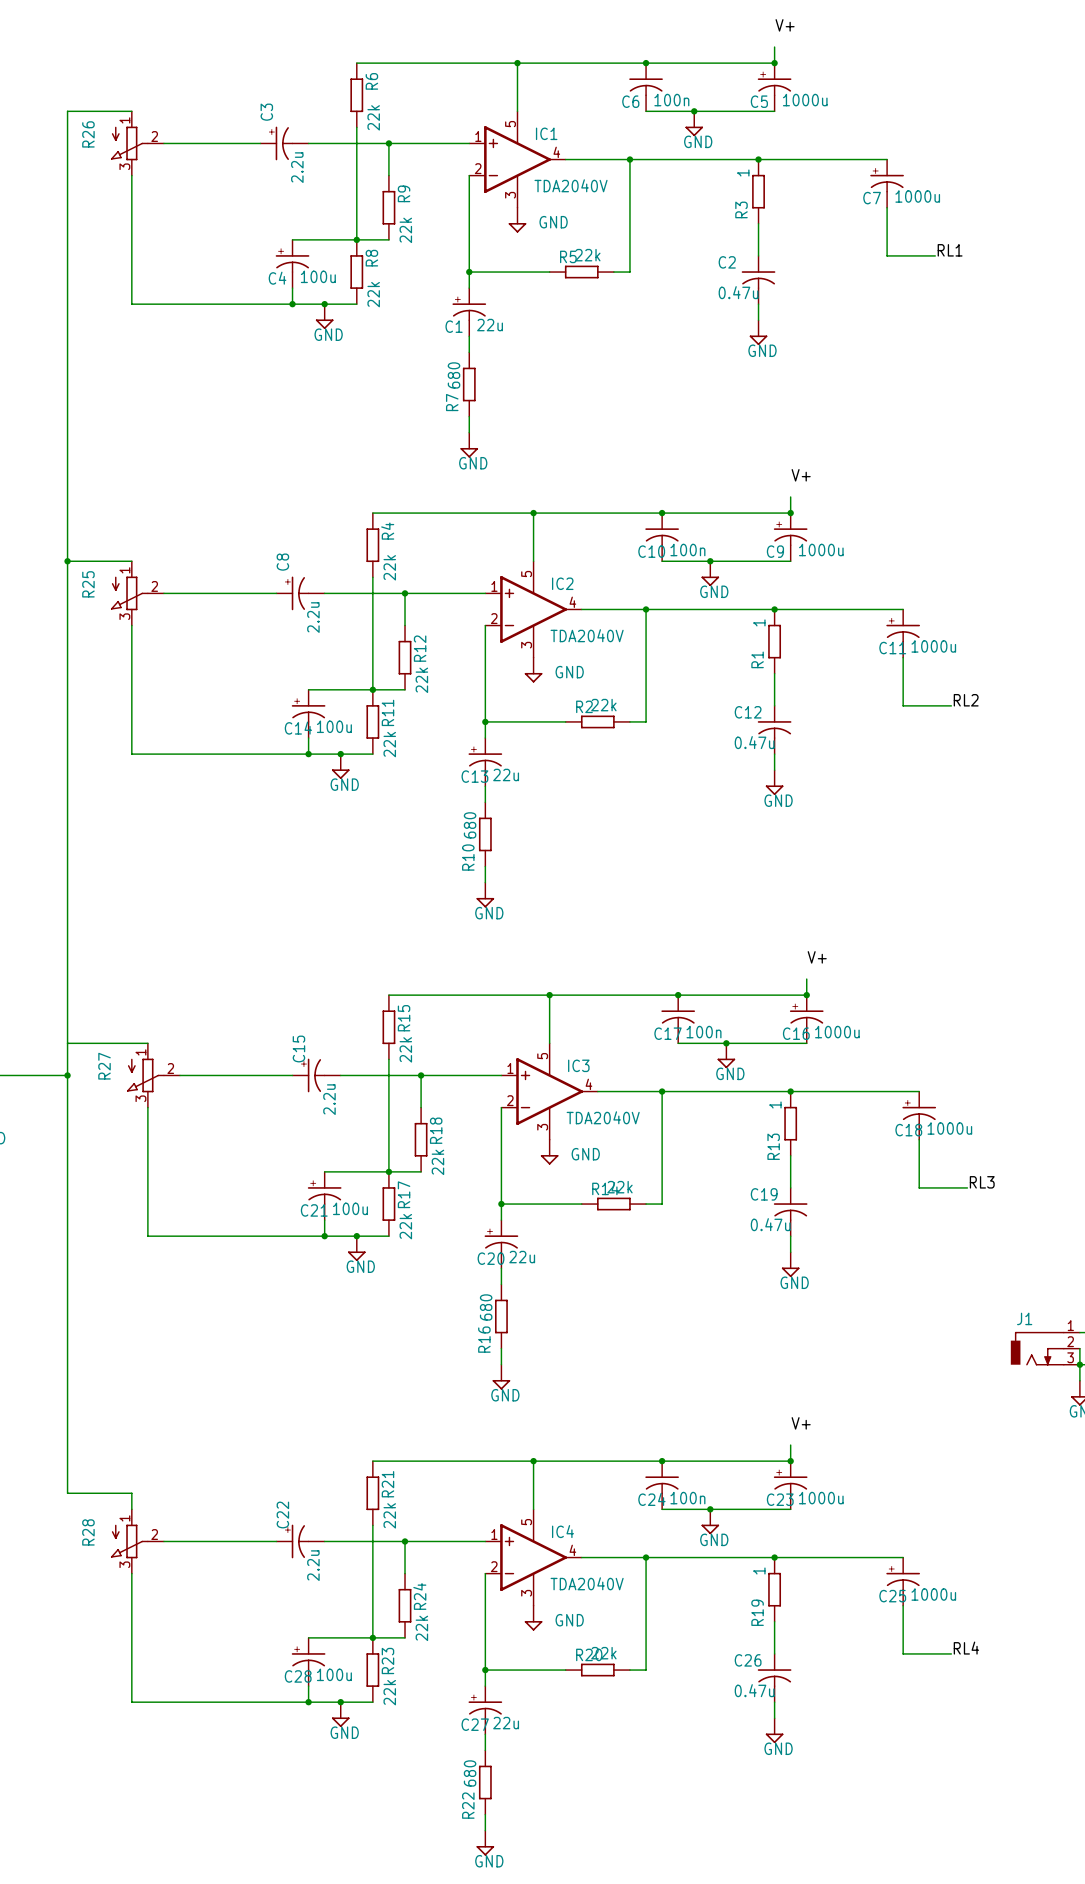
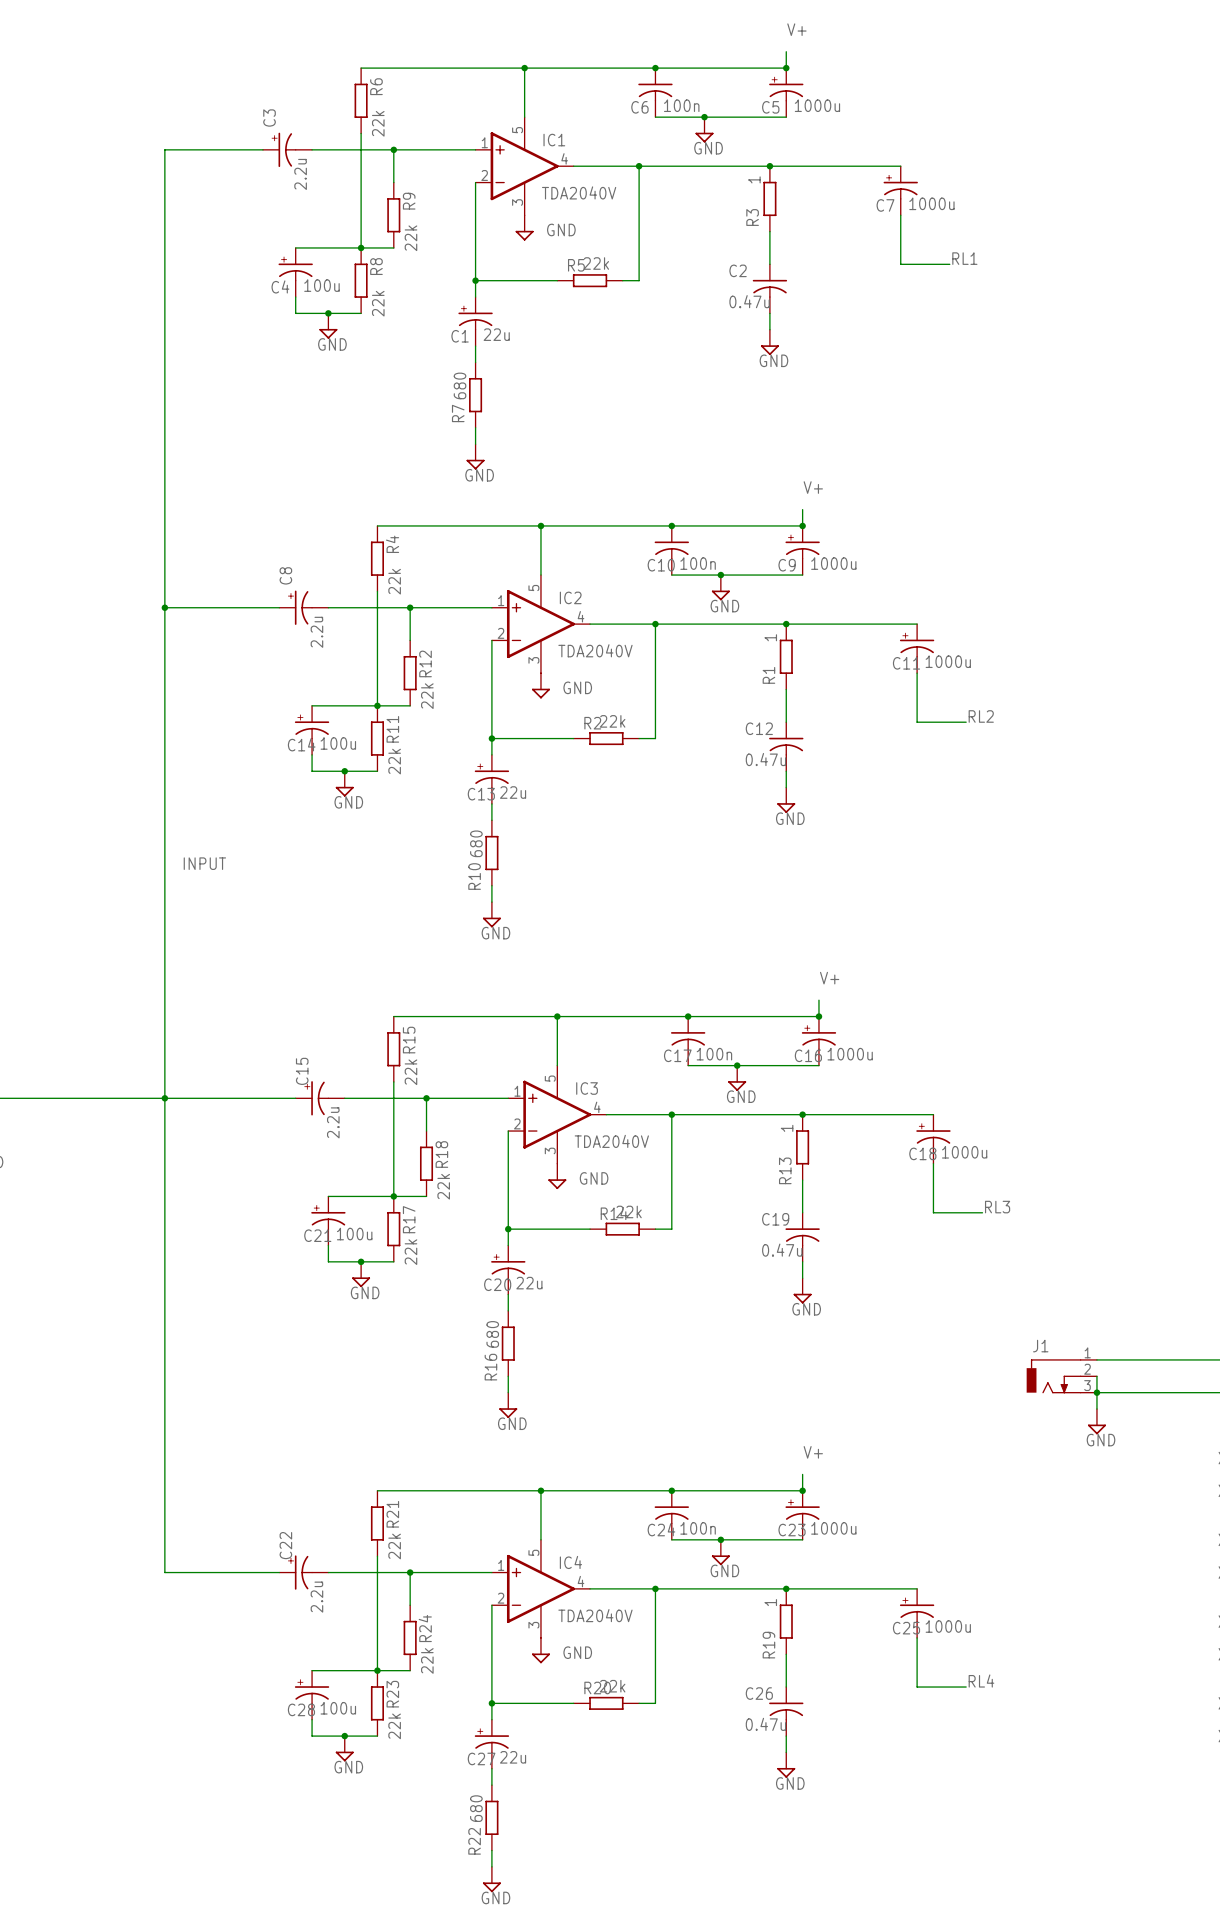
wire: (131, 111) (67, 111) (67, 1493) (131, 1493) (131, 1509) -> none
R26: (137, 143) -> none
wire: none -> (164, 149) (164, 1572)
wire: (131, 175) (131, 304) (292, 304) -> none
junction: (292, 304) -> none
wire: (67, 561) (131, 561) -> none
junction: (67, 561) -> none
R25: (137, 593) -> none
junction: none -> (164, 607)
wire: (131, 625) (131, 754) (308, 754) -> none
junction: (308, 754) -> none
label: none -> INPUT (204, 863)
wire: (67, 1043) (147, 1043) -> none
wire: none -> (66, 1098) (181, 1098)
junction: (67, 1075) -> none
R27: (153, 1075) -> none
junction: none -> (164, 1098)
wire: (147, 1107) (147, 1236) (324, 1236) -> none
junction: (324, 1236) -> none
R28: (137, 1541) -> none
wire: (131, 1573) (131, 1702) (308, 1702) -> none
junction: (308, 1702) -> none

